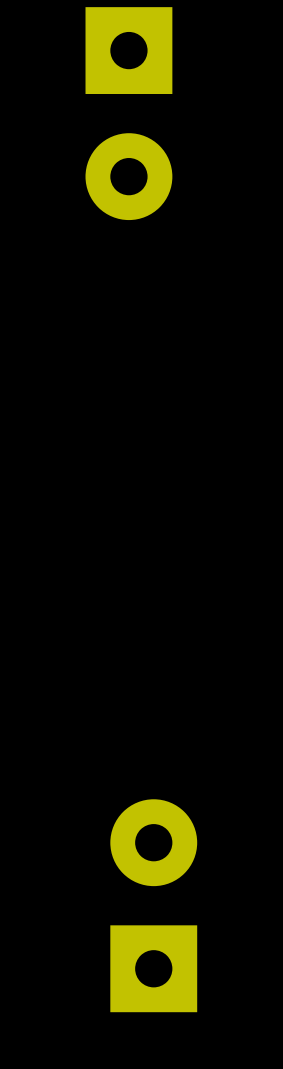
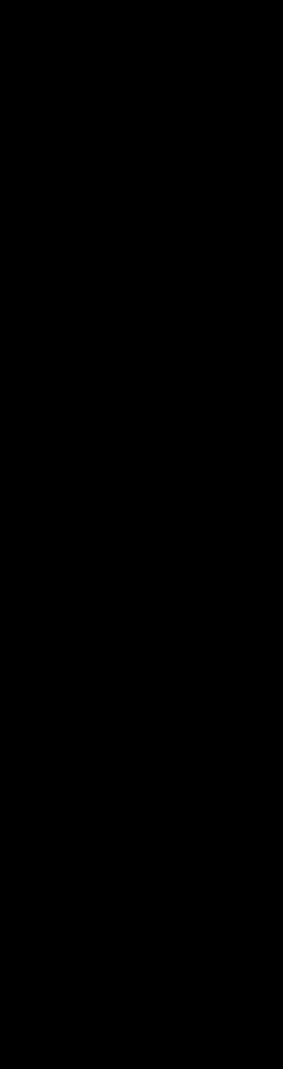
part: (128, 113) -> none
part: (153, 905) -> none

